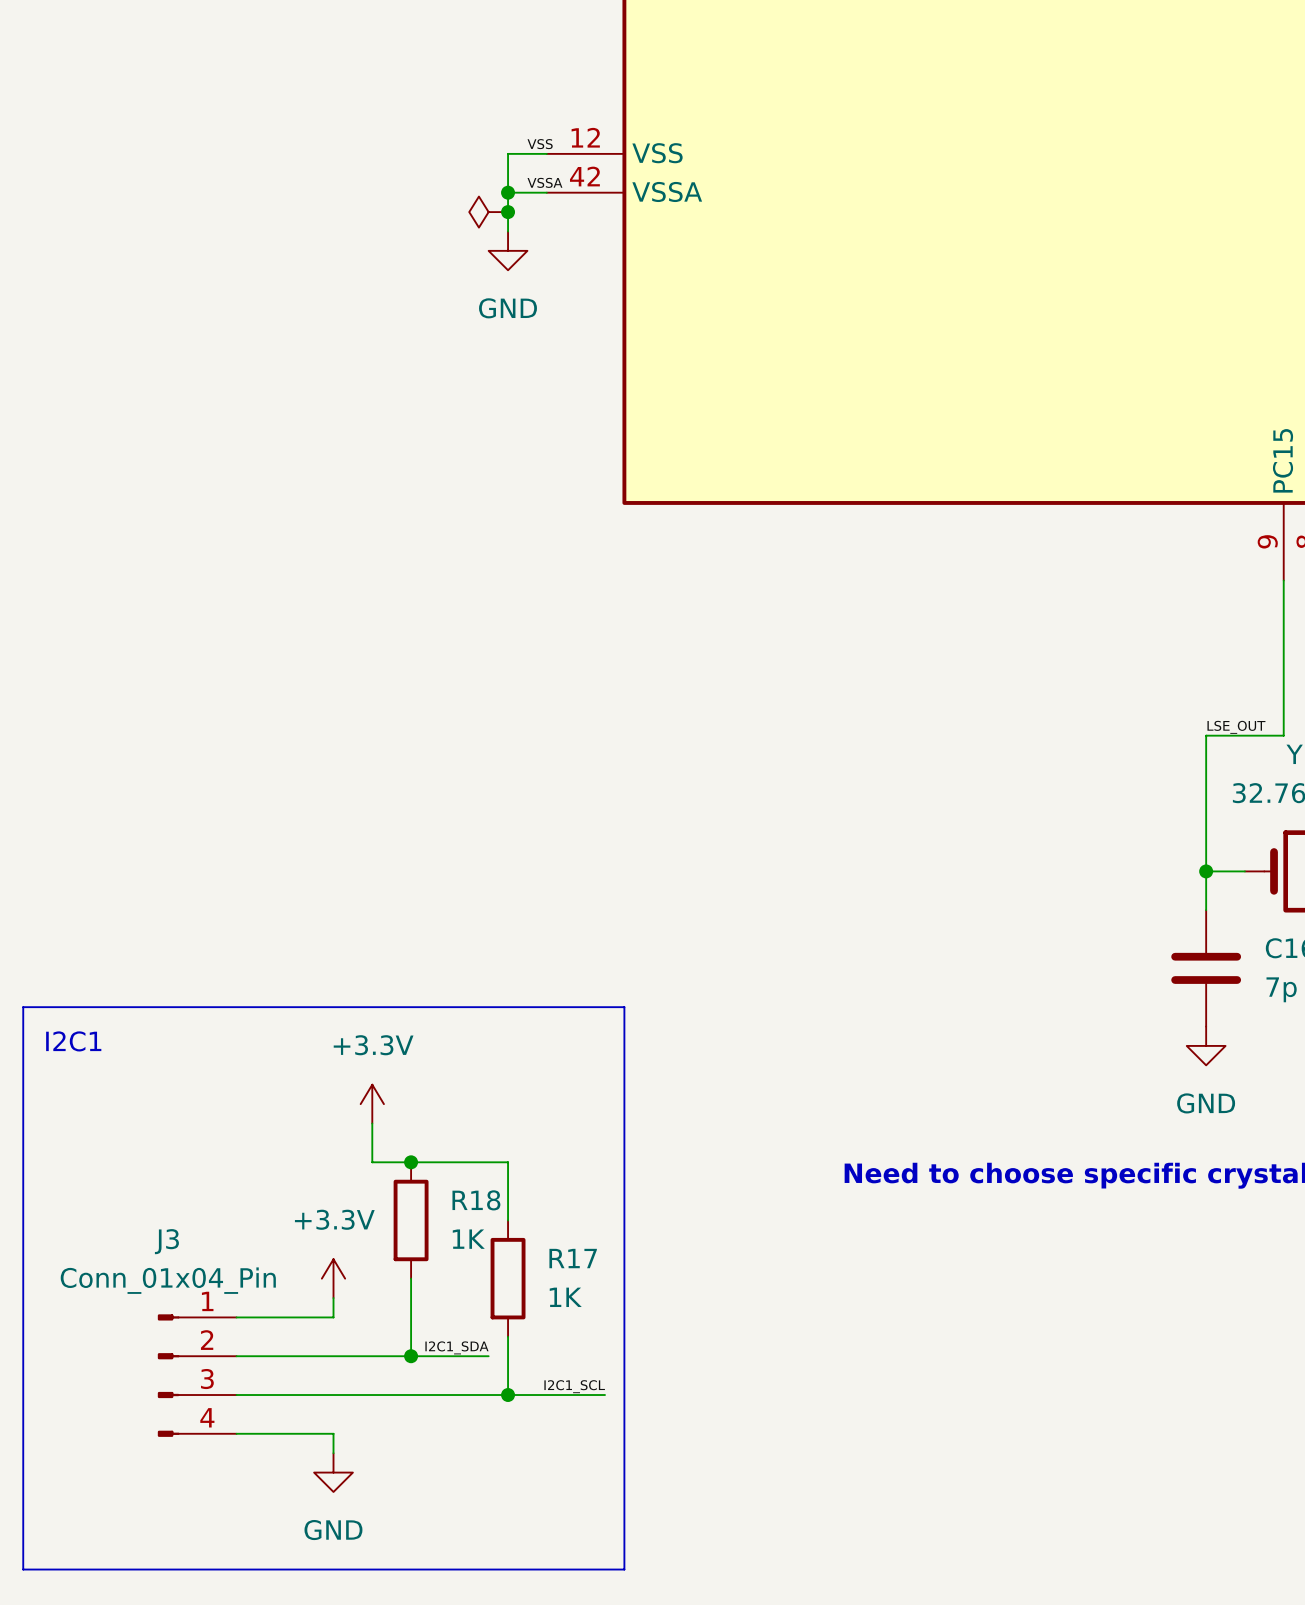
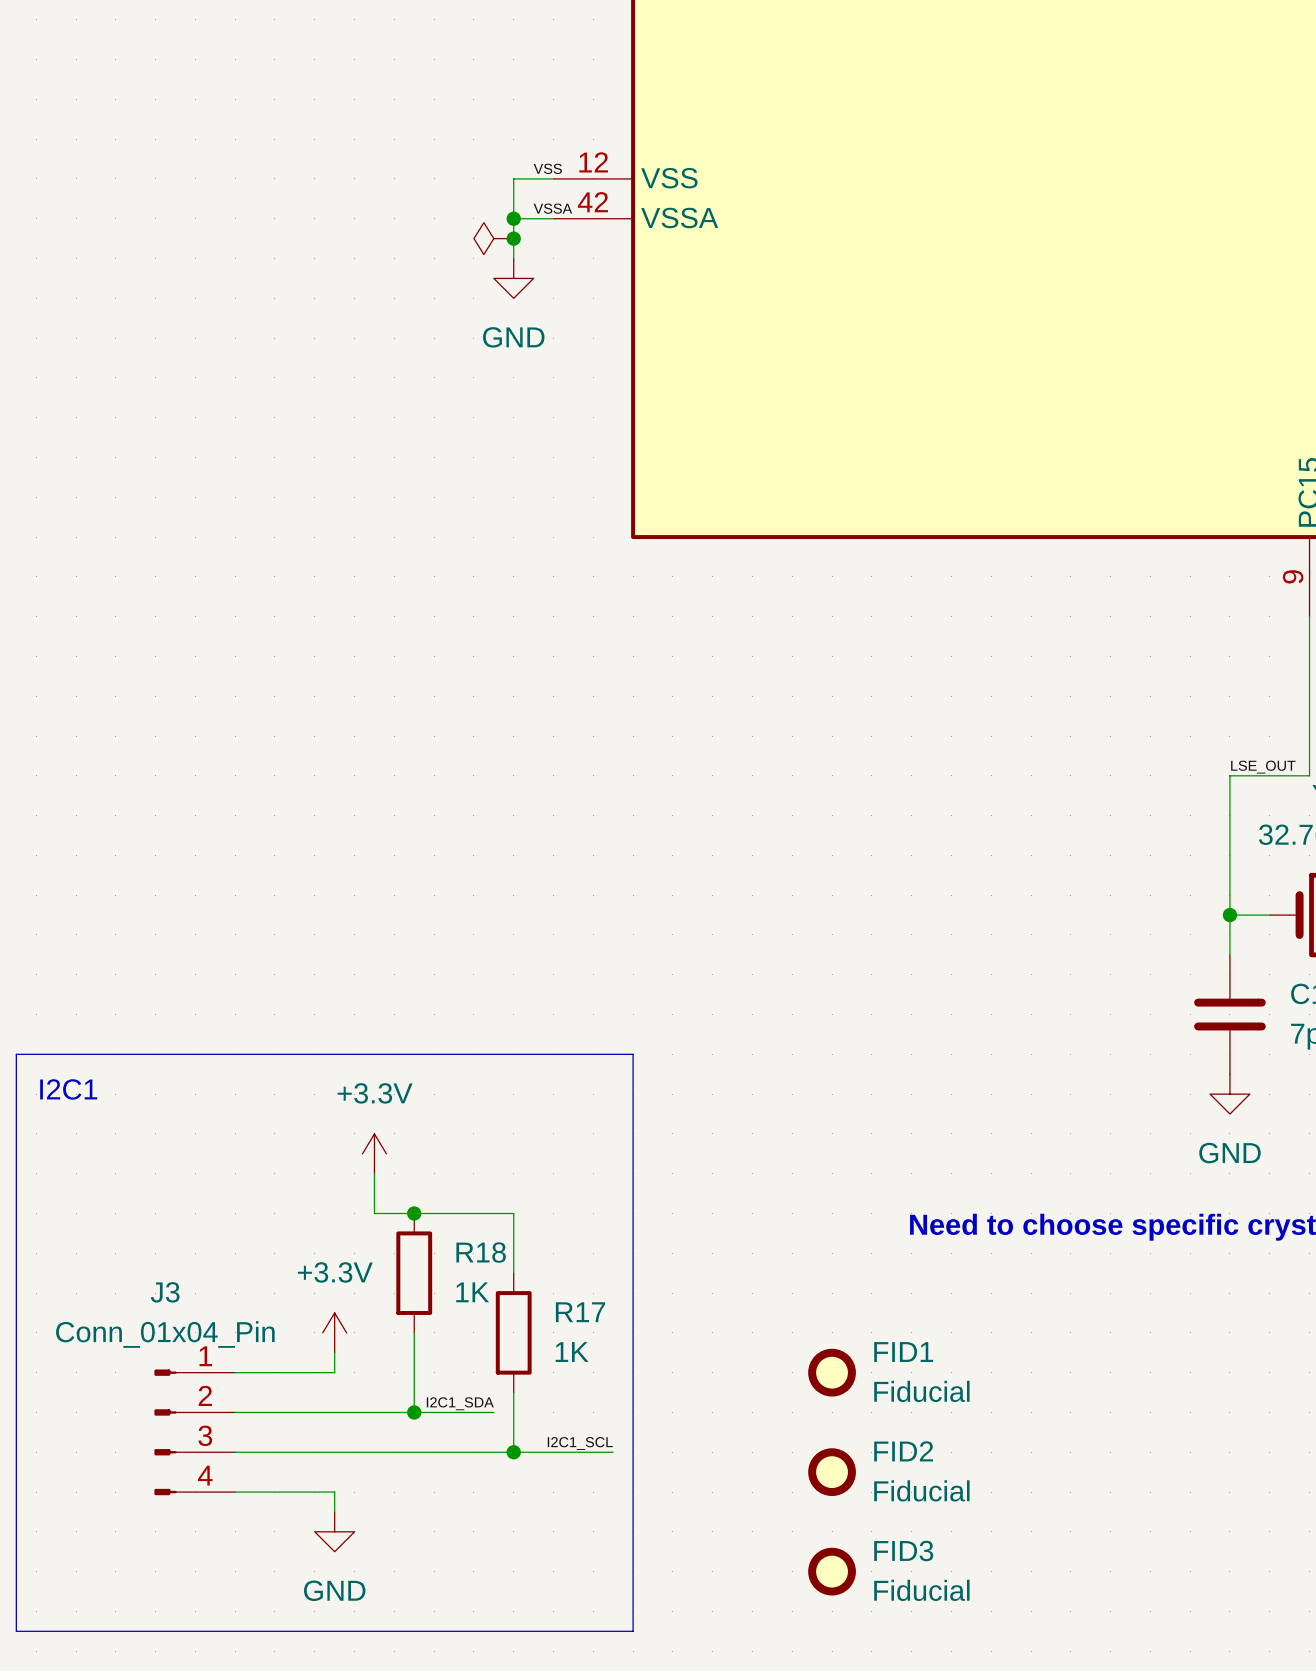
FID1: none -> Fiducial (832, 1372)
FID2: none -> Fiducial (832, 1472)
FID3: none -> Fiducial (832, 1571)

